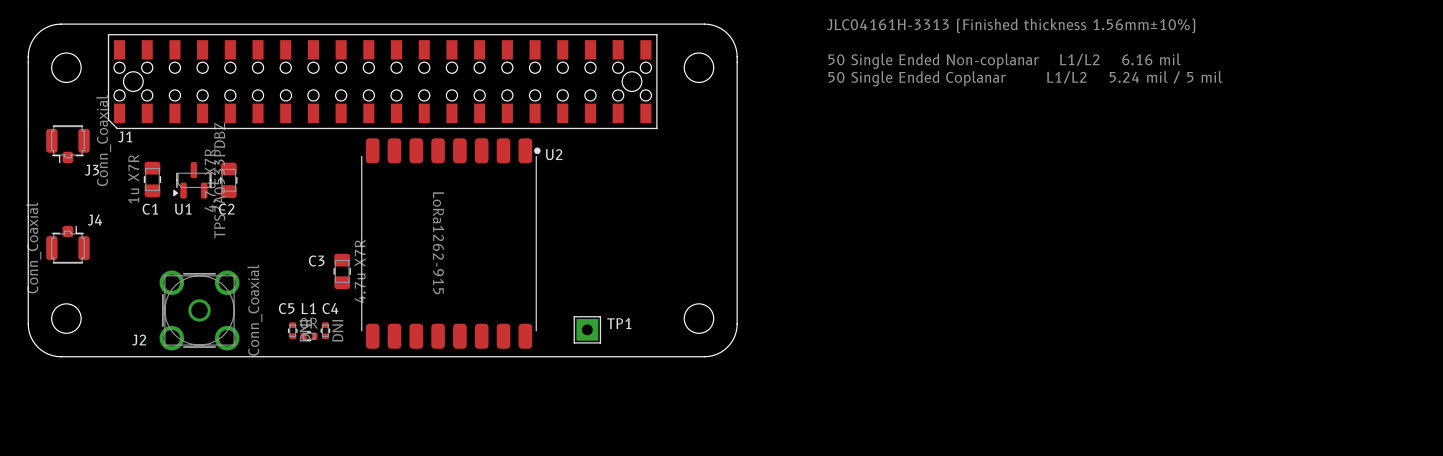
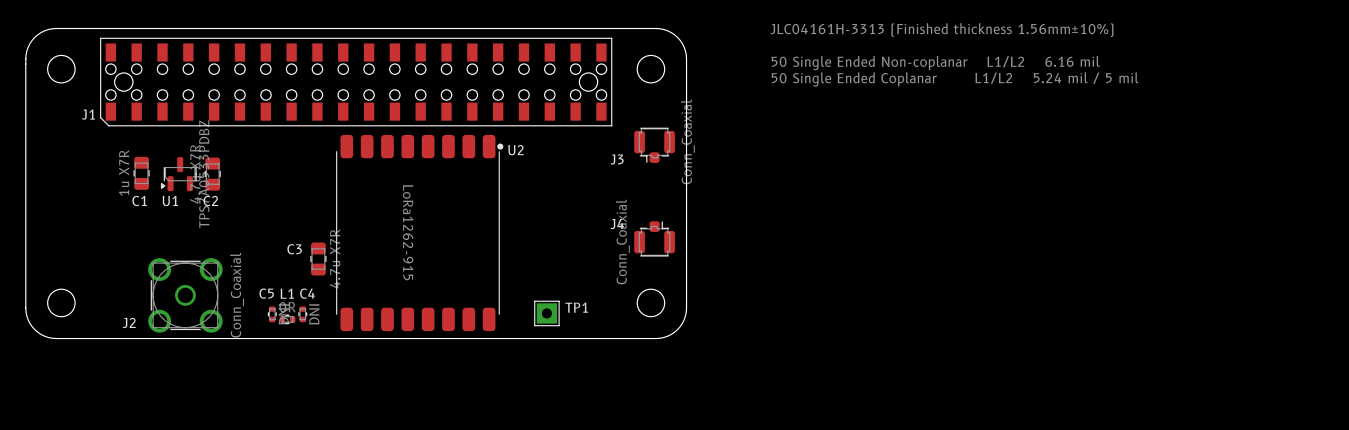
J1 name position: J1 (125, 136) -> J1 (88, 114)
J3 position: (67, 144) -> (654, 145)
J3 name position: J3 (92, 170) -> J3 (617, 159)
J4 name position: J4 (94, 220) -> J4 (617, 224)
J4 position: (67, 244) -> (654, 238)

